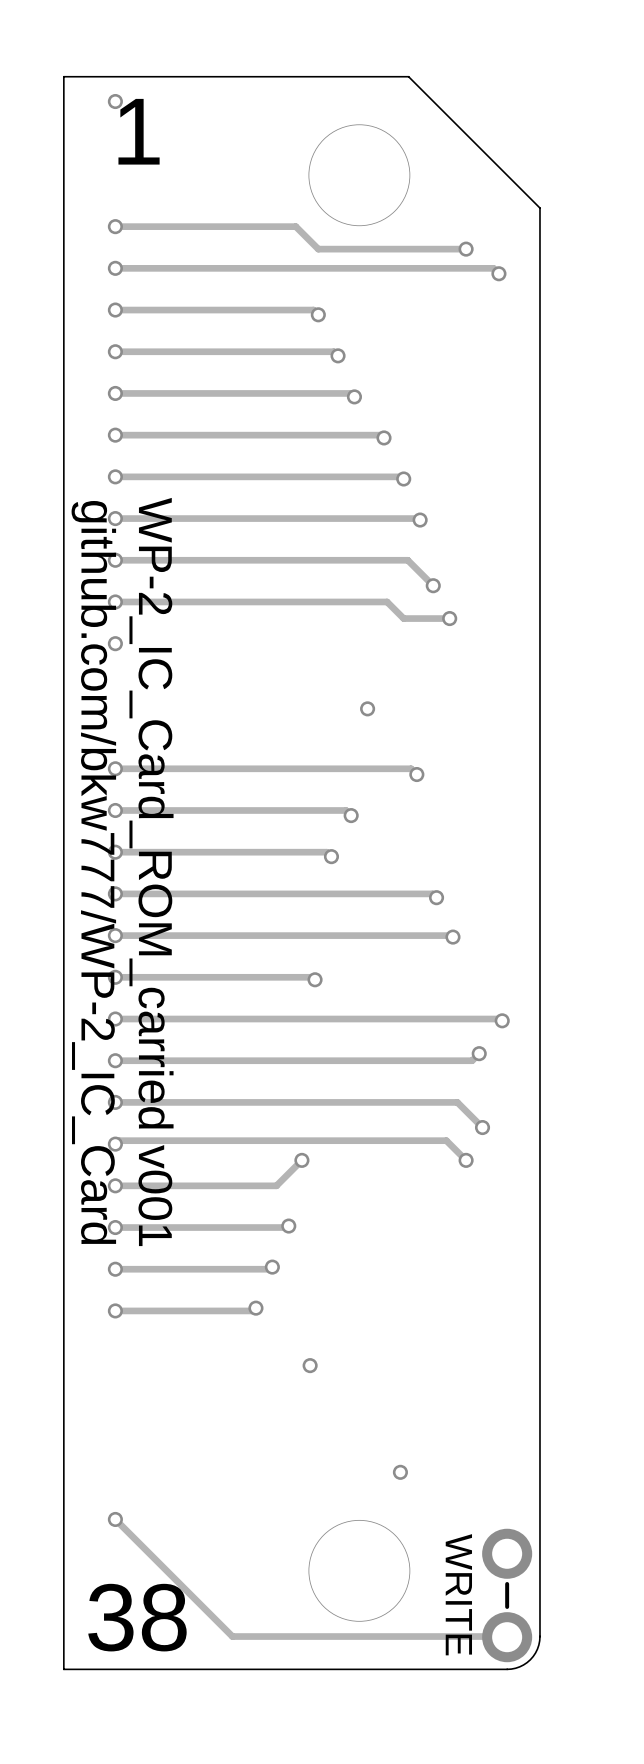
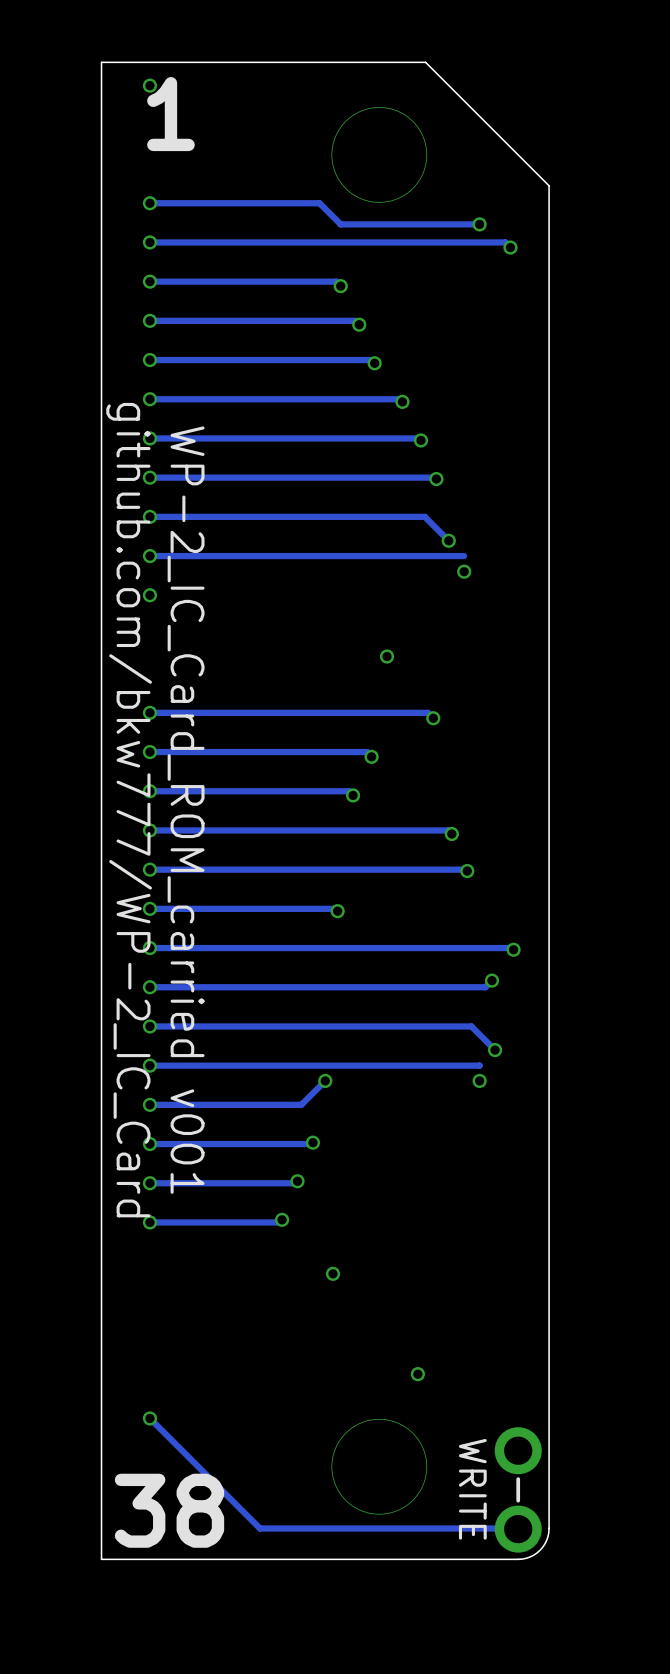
track: (387, 601) (403, 618) (449, 618) -> (405, 556) (464, 556)
track: (115, 1144) (118, 1140) (446, 1140) (466, 1160) -> (149, 1065) (479, 1065)

